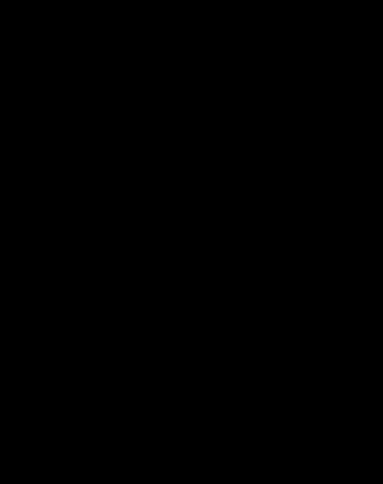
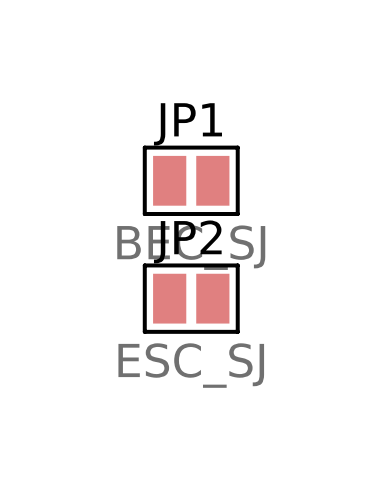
JP1: none -> BEC_SJ (191, 180)
JP2: none -> ESC_SJ (191, 298)

